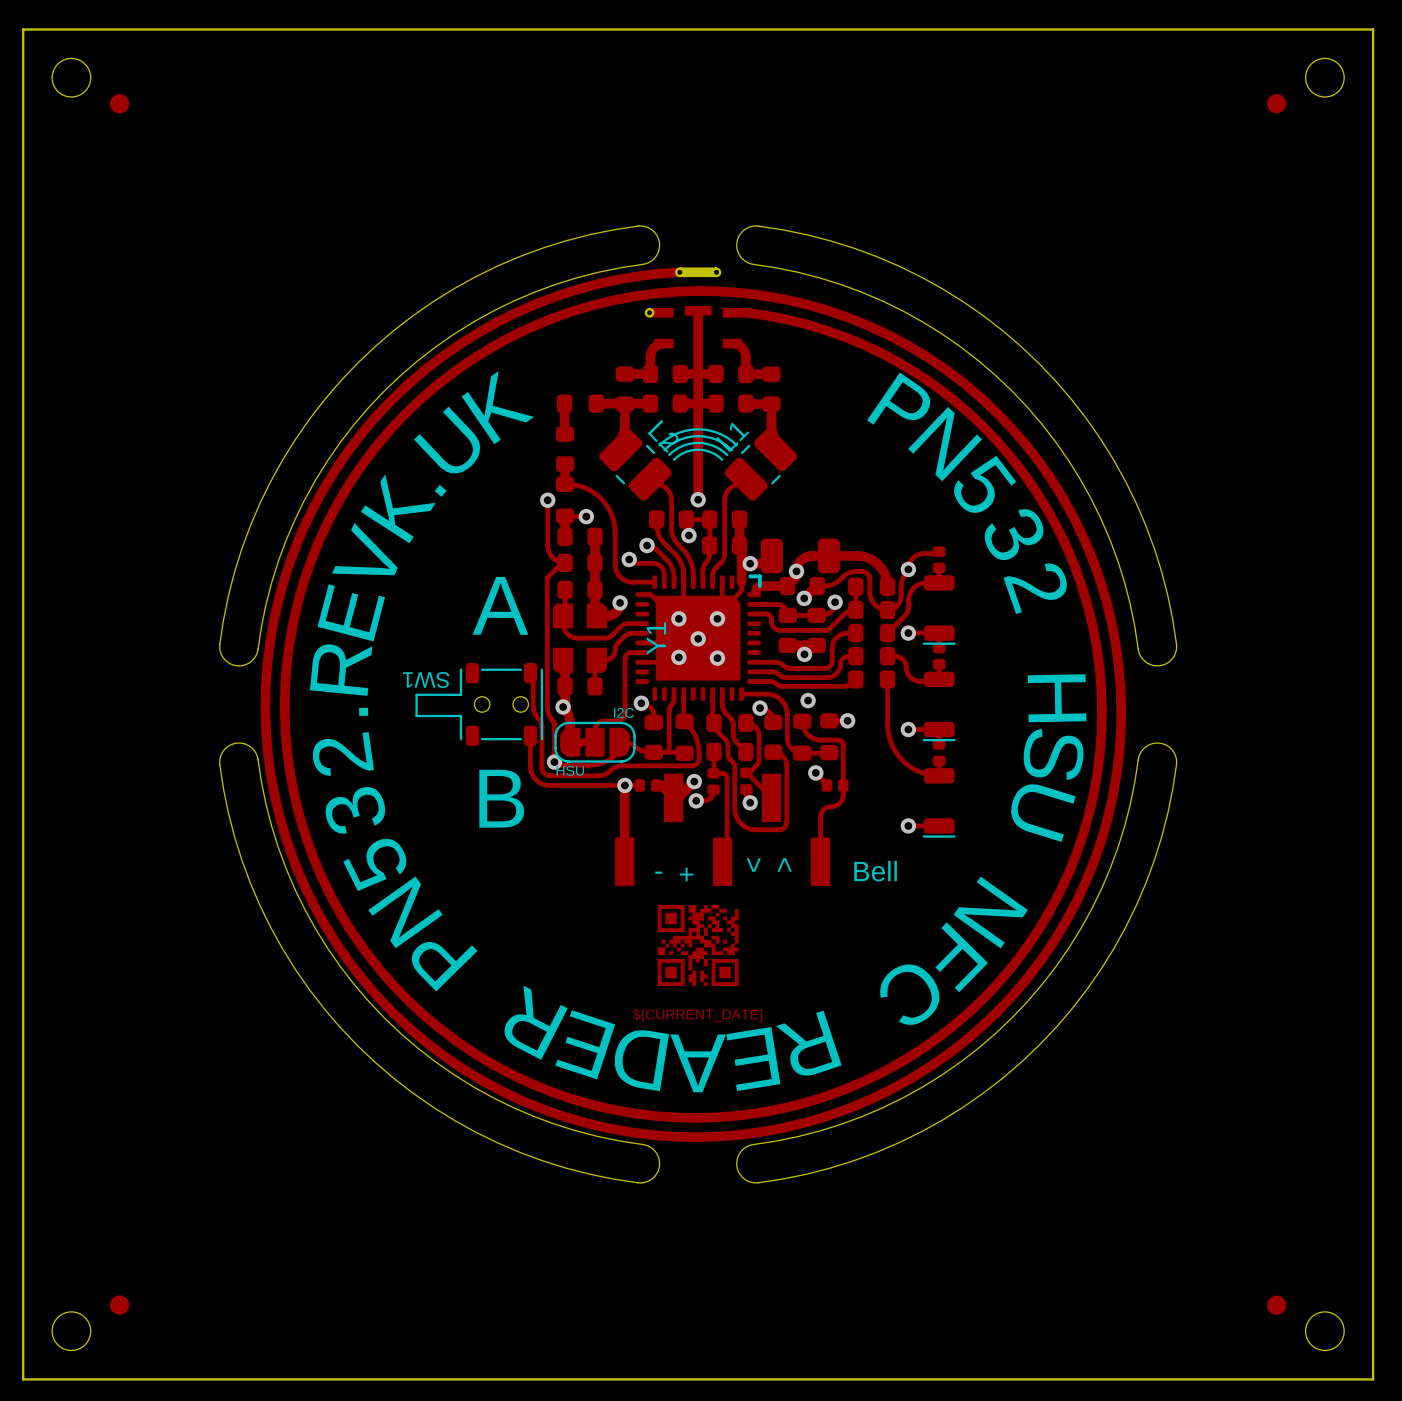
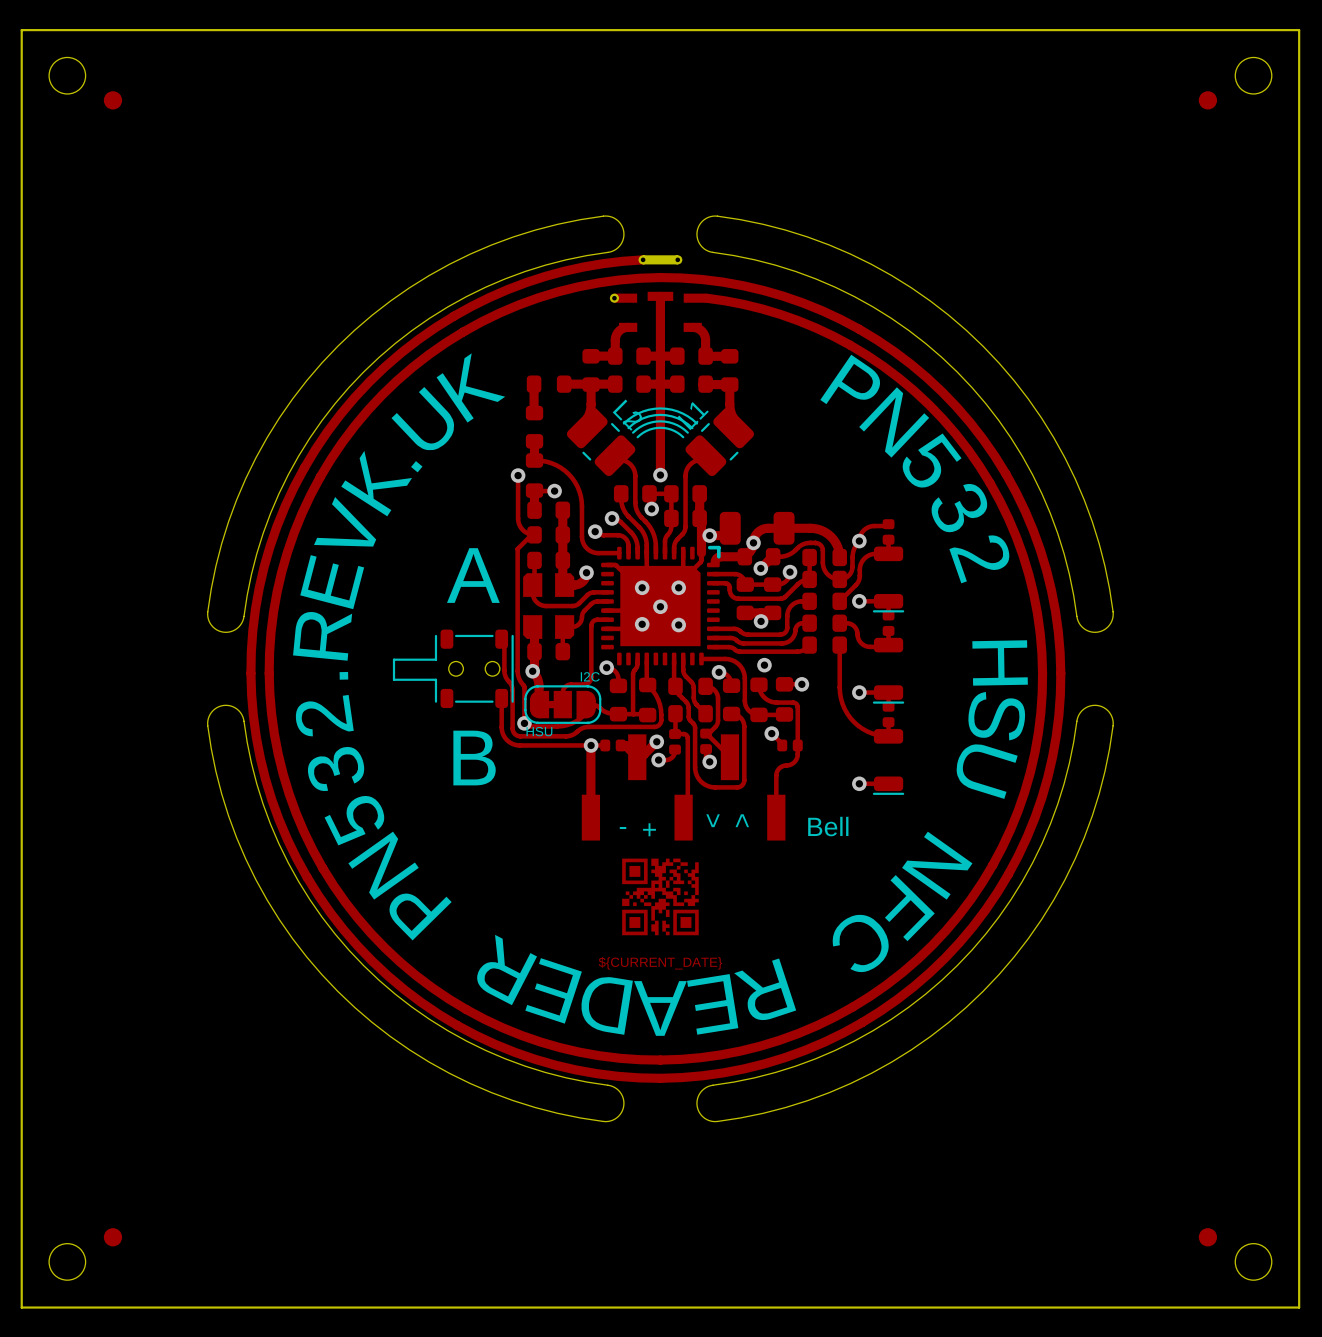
Y1 name: Y1 (656, 638) -> none
SW1 name: SW1 (426, 679) -> none

